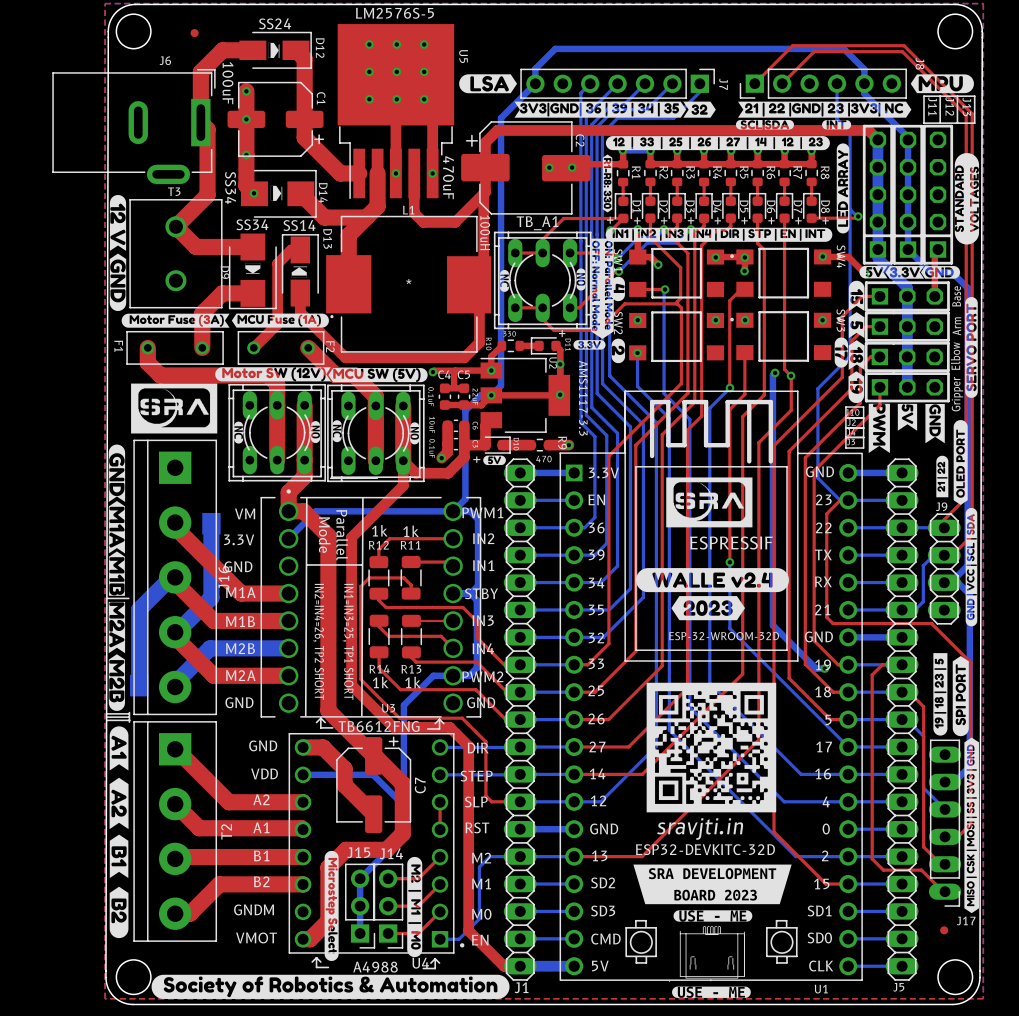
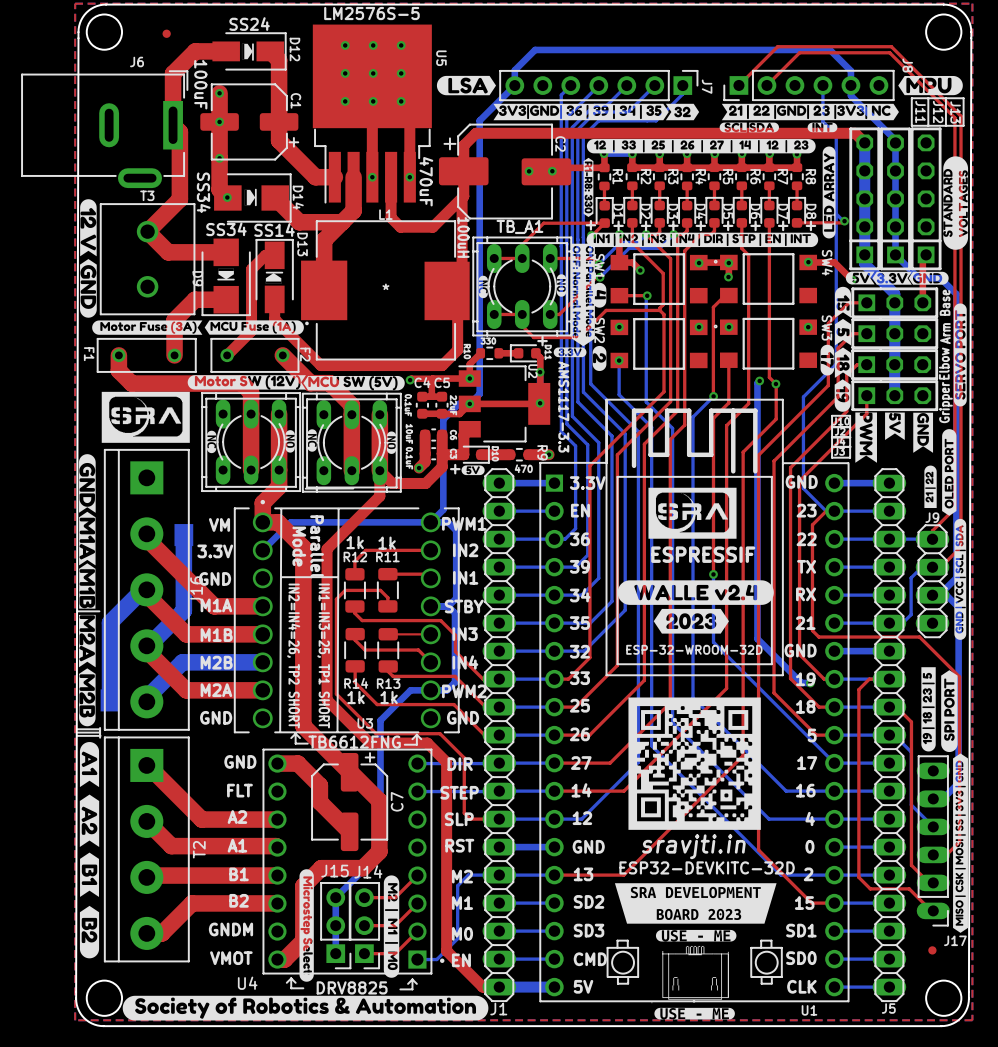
U4 footprint: [288, 733, 465, 954] -> [262, 748, 445, 975]
text: VDD (264, 773) -> FLT (239, 790)
bottom track: (303, 774) (373, 774) (403, 805) -> none
top track: (440, 802) (440, 829) -> none
U4 name position: U4 (420, 963) -> U4 (247, 983)
text: A4988 (375, 967) -> DRV8825 (352, 987)

